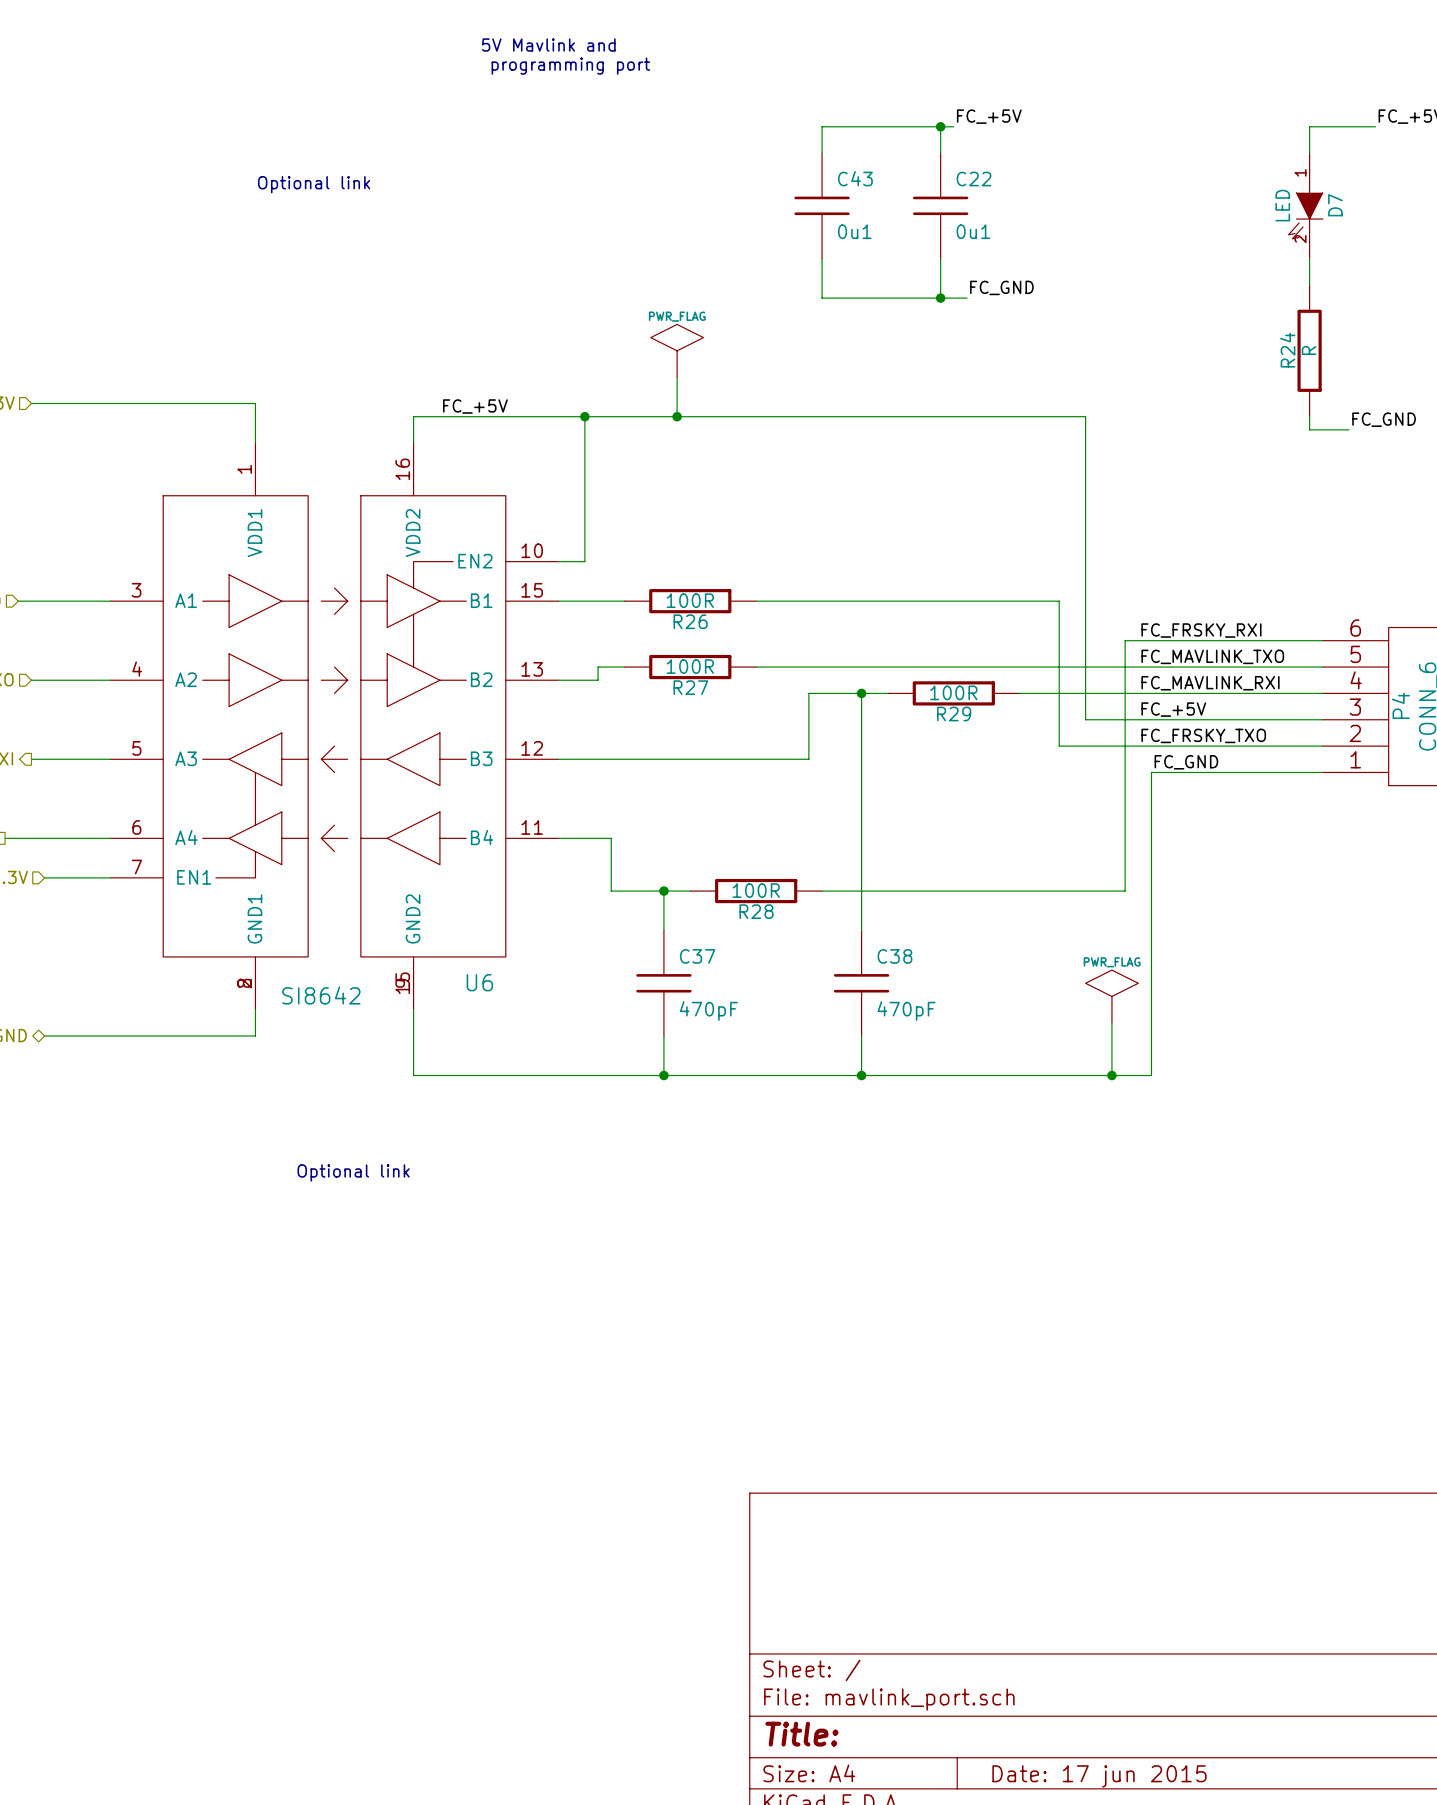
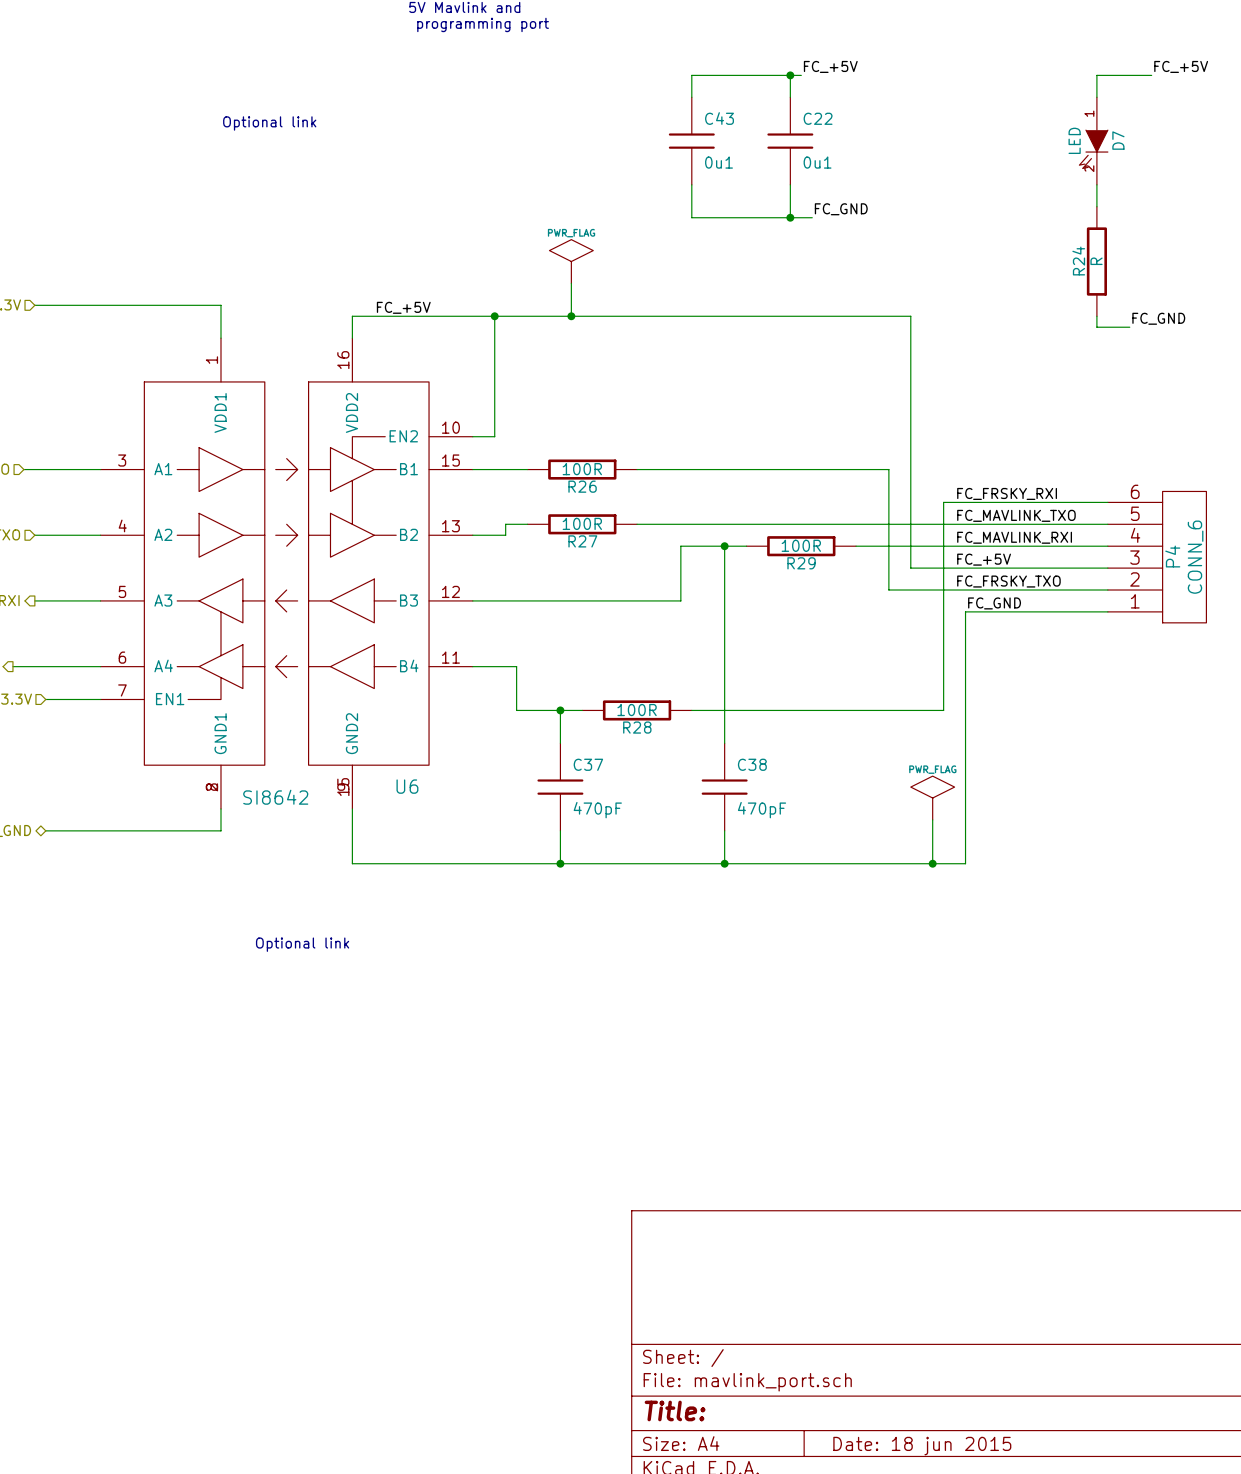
title block: Date: 17 jun 2015 (1099, 1776) -> Date: 18 jun 2015 (922, 1446)

